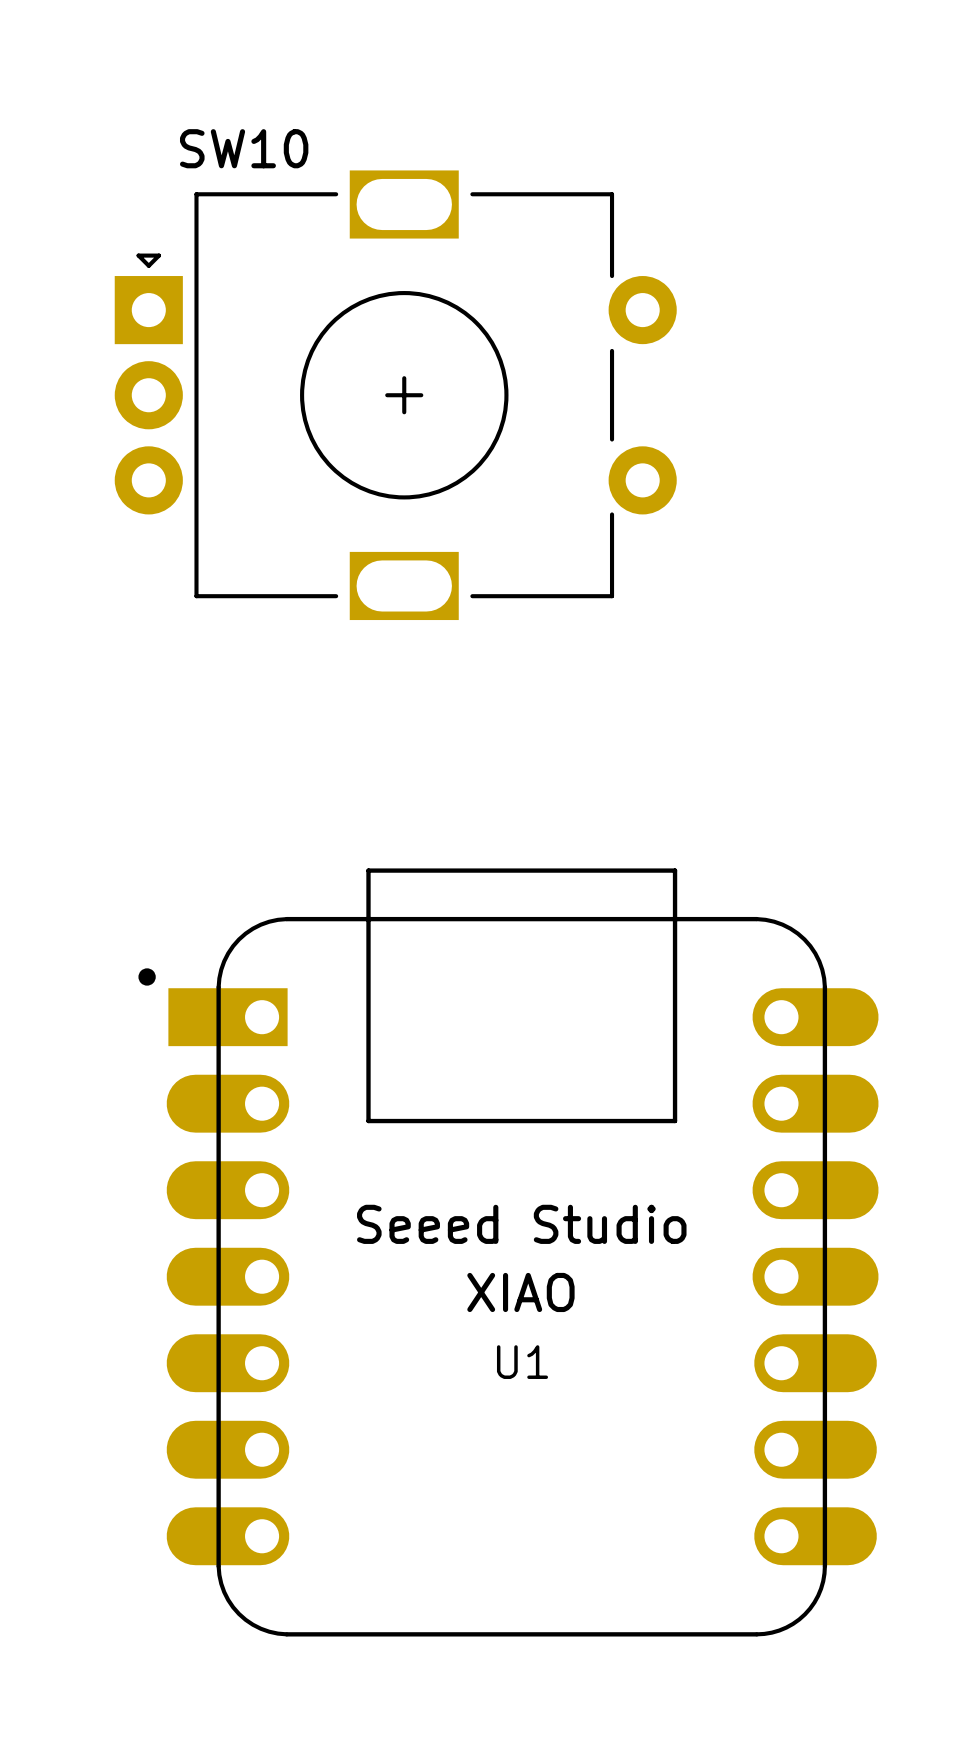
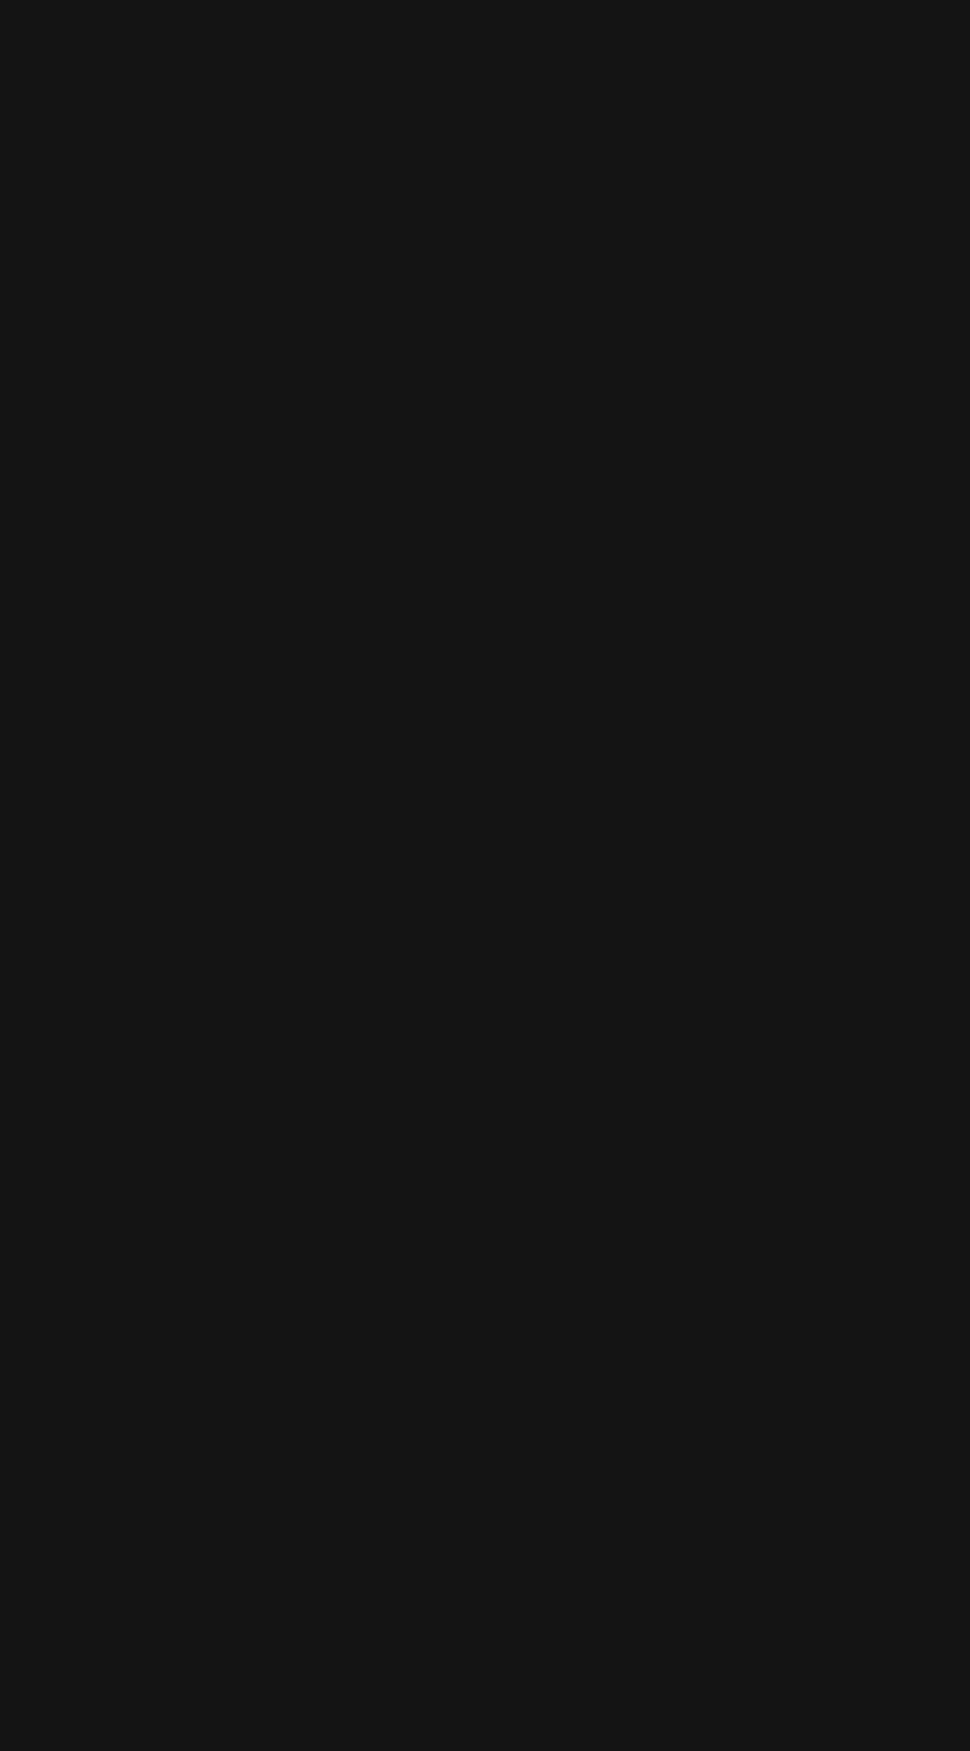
SW10: (395, 395) -> none
U1: (508, 1252) -> none

